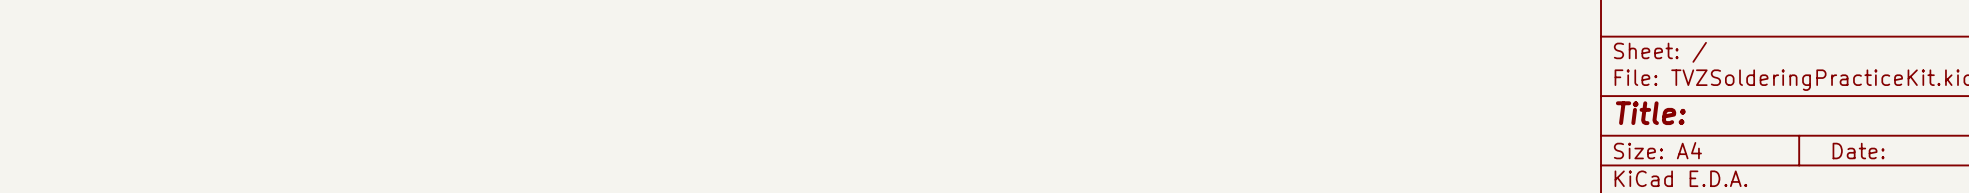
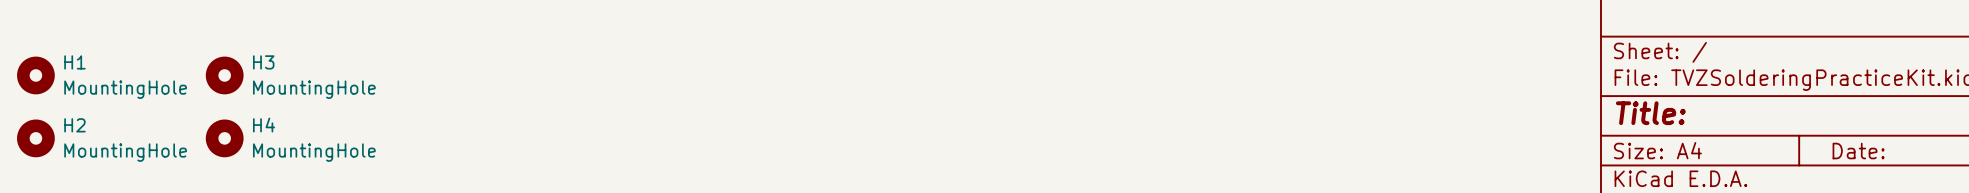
H1: none -> MountingHole (35, 75)
H3: none -> MountingHole (224, 75)
H2: none -> MountingHole (35, 138)
H4: none -> MountingHole (224, 138)

